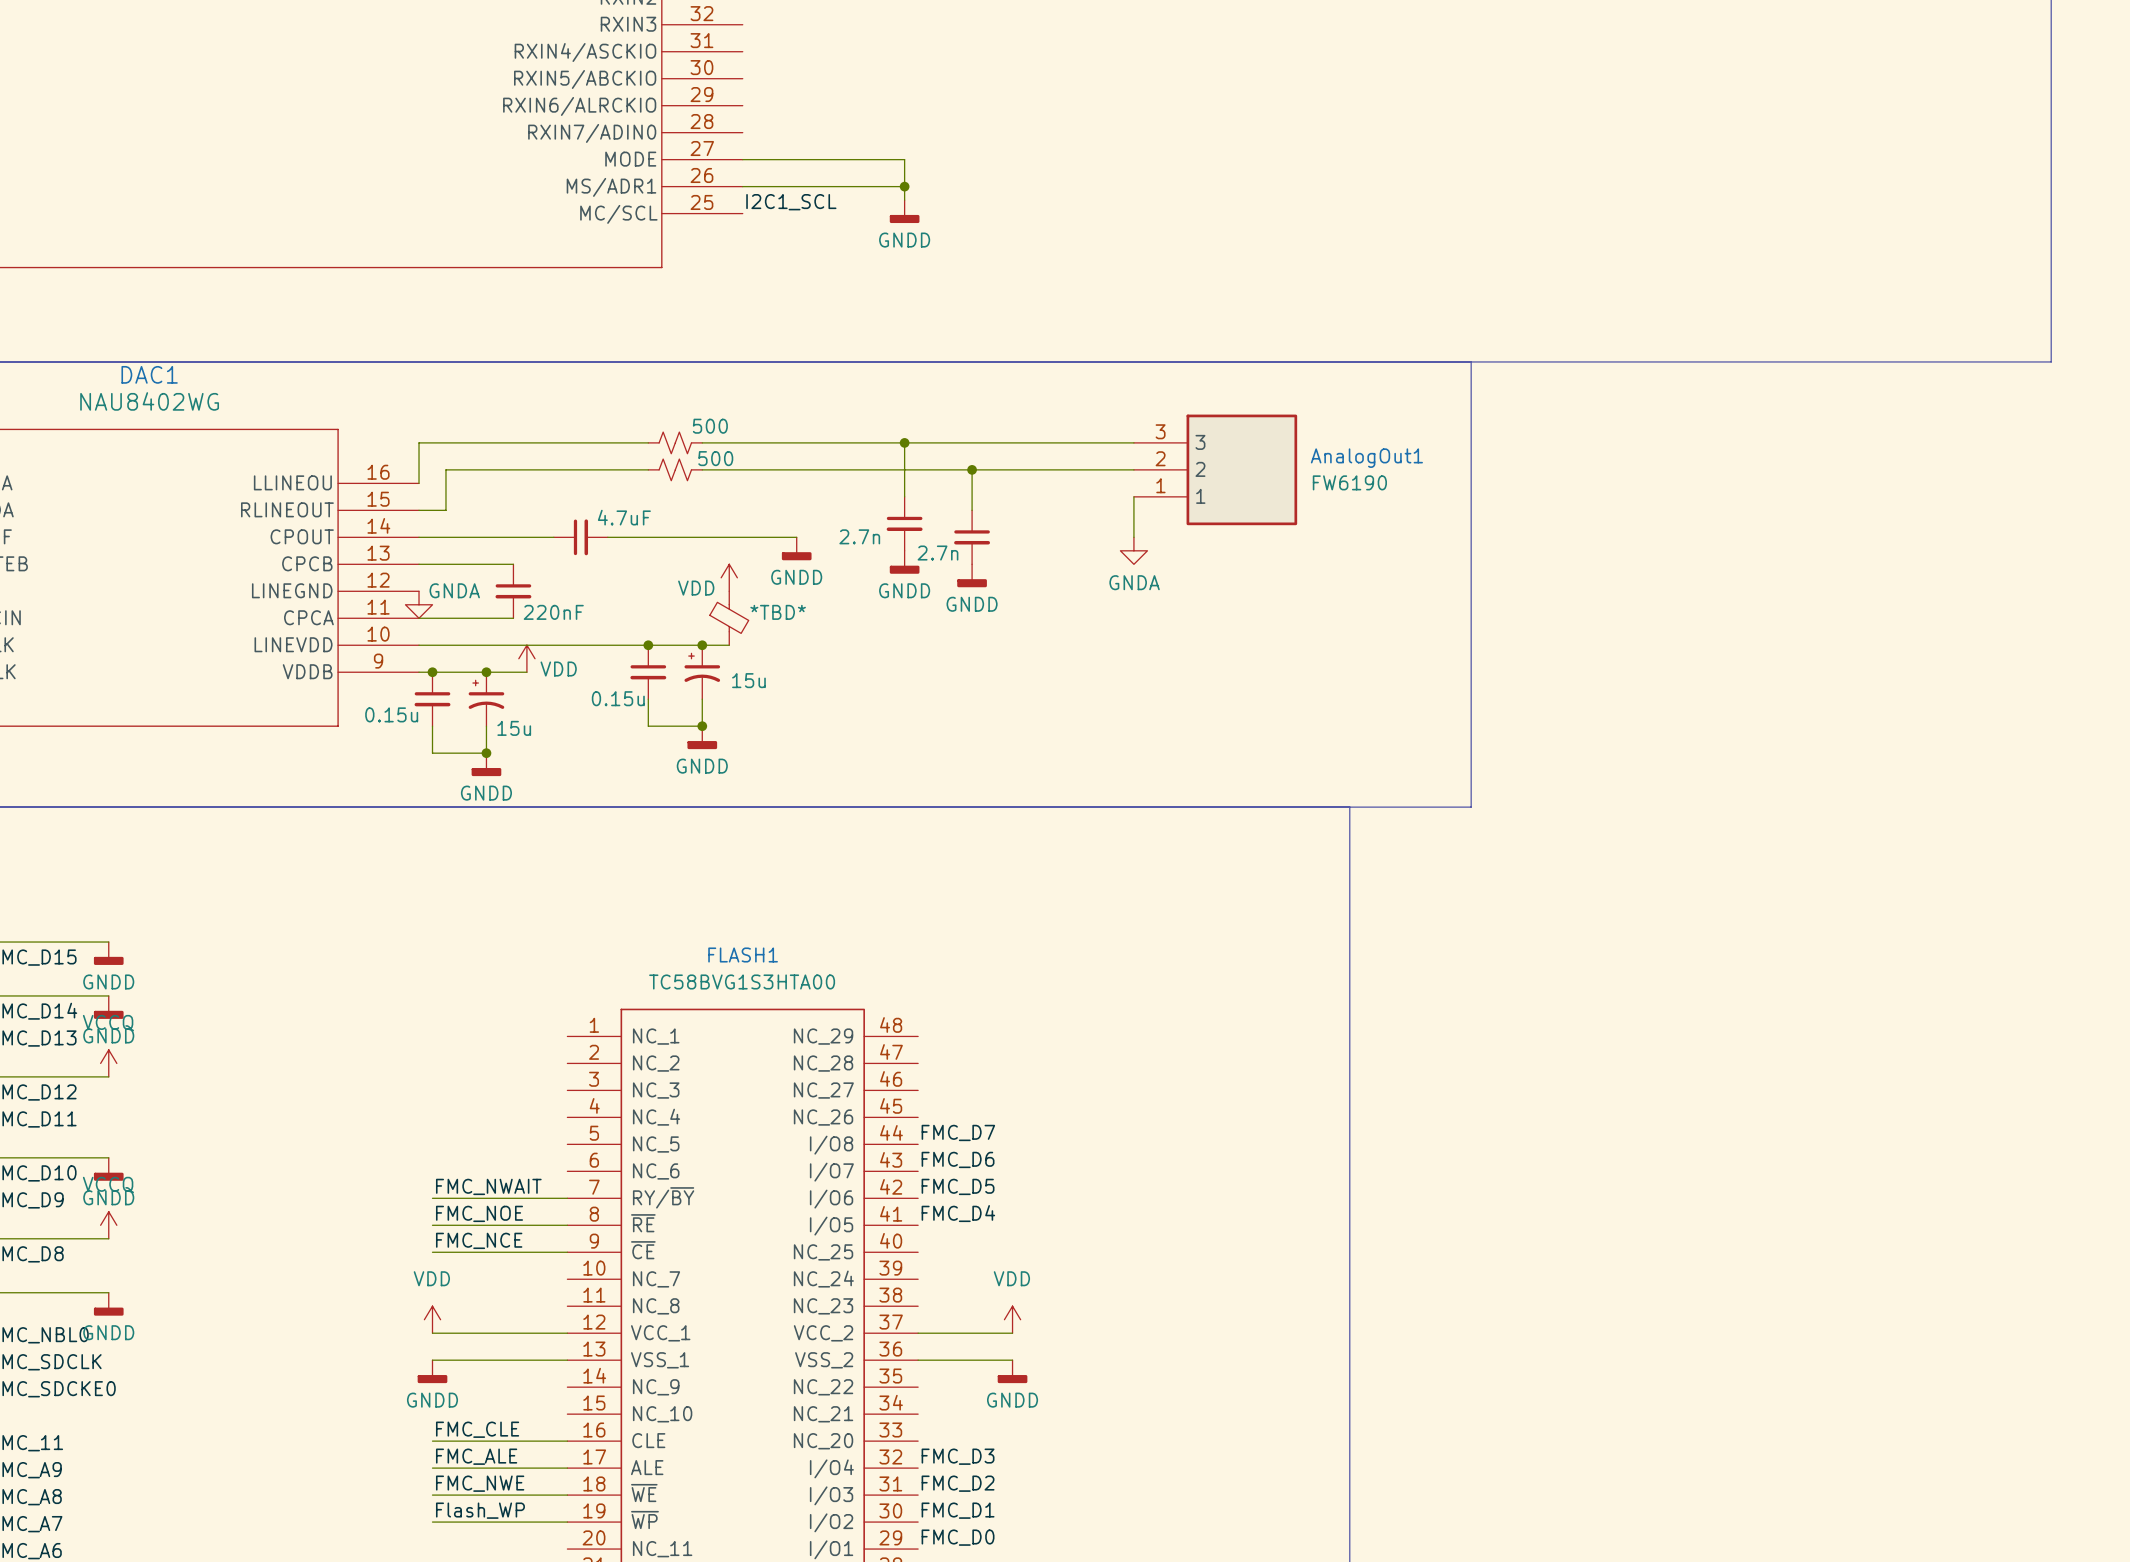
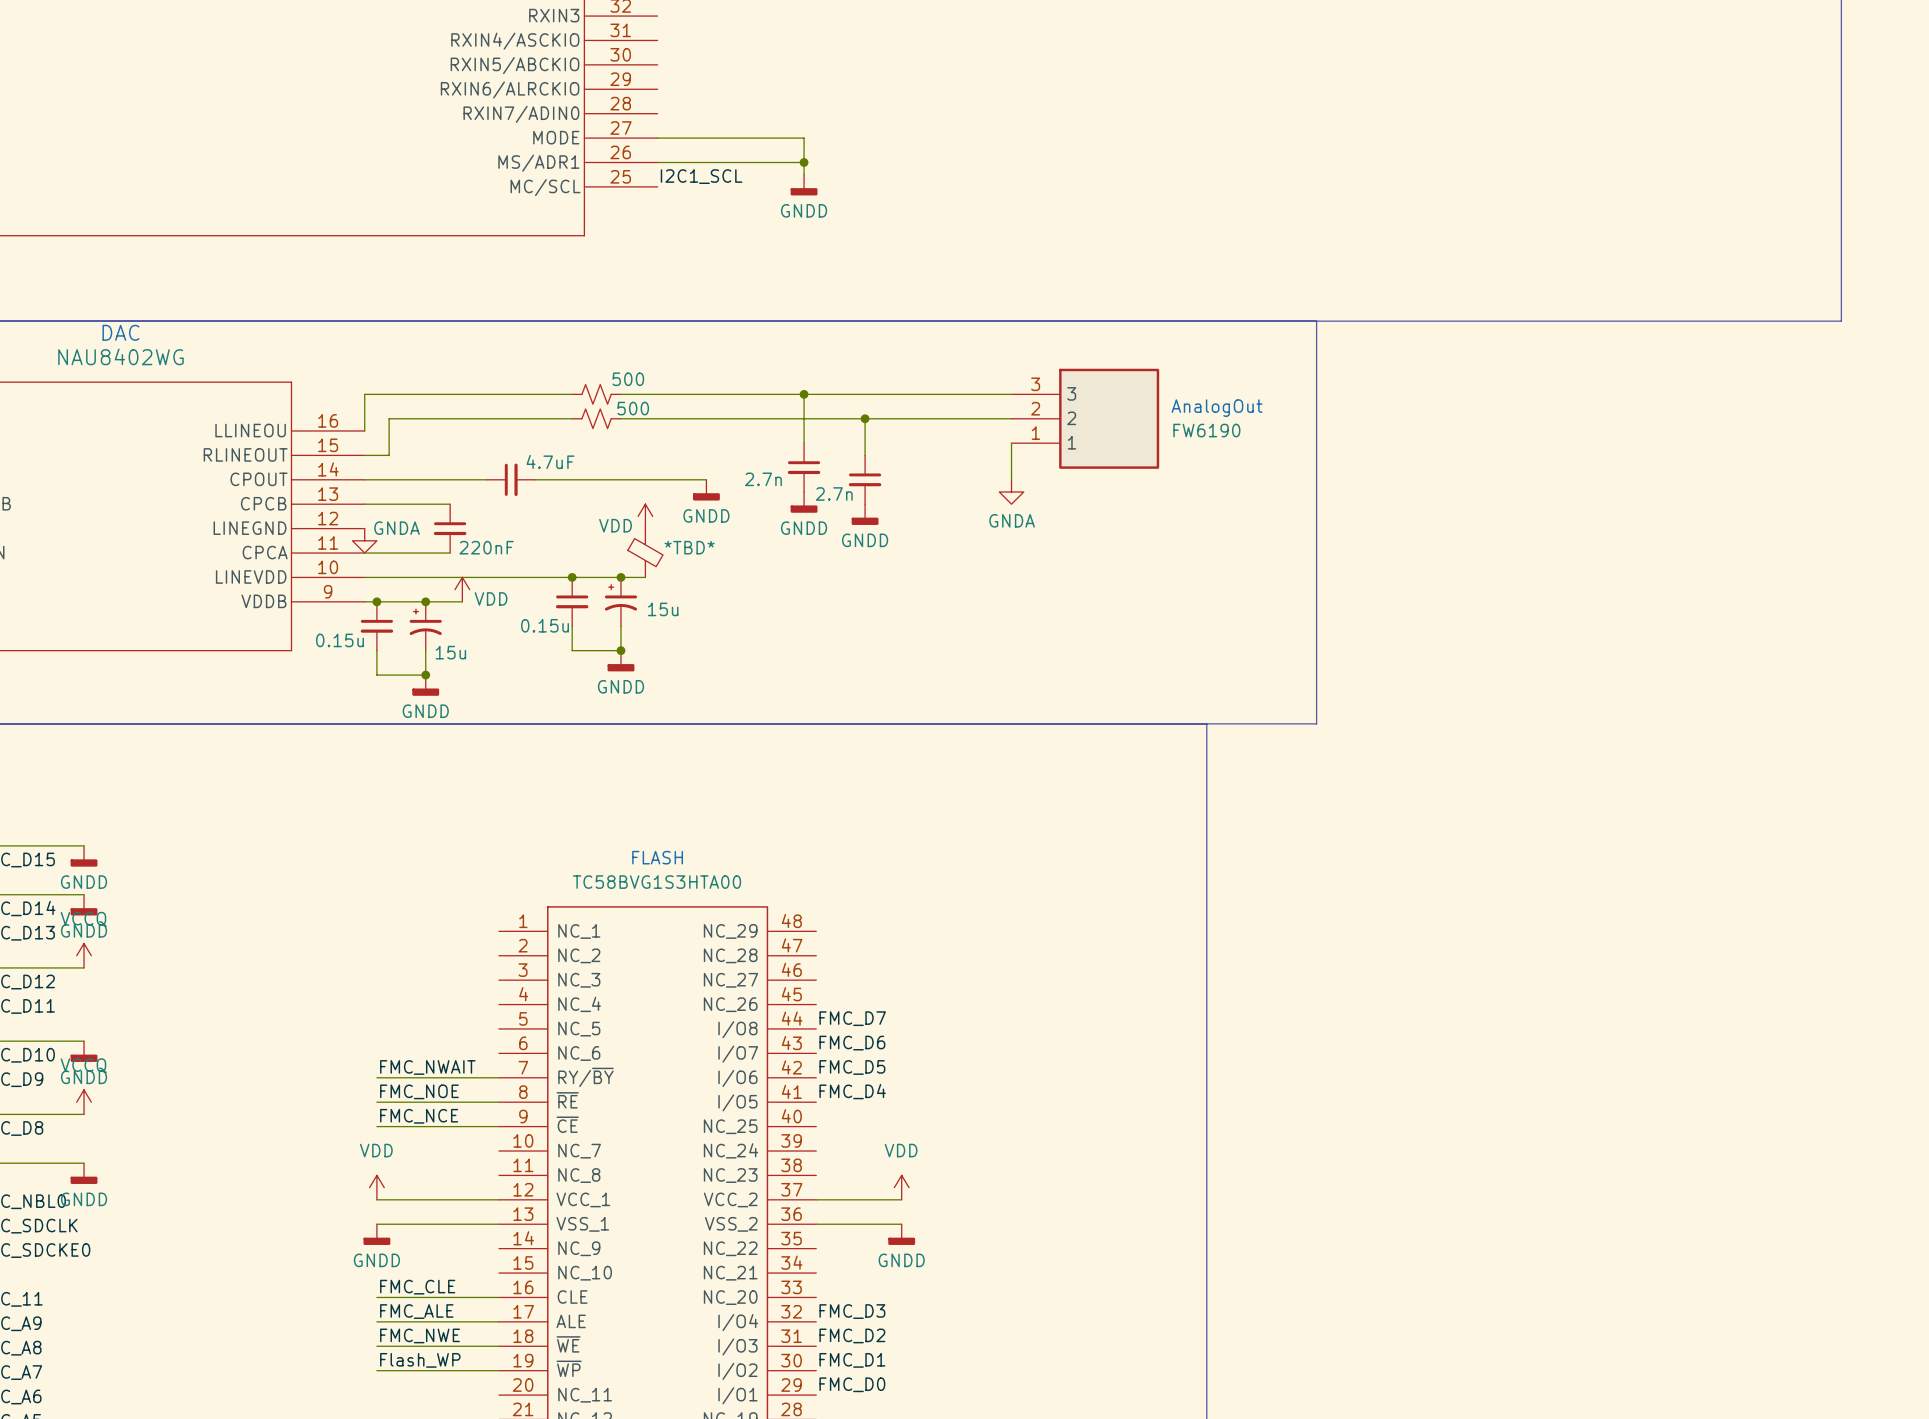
DAC1 name: DAC1 (149, 374) -> DAC (120, 332)
AnalogOut1 name: AnalogOut1 (1366, 458) -> AnalogOut (1217, 408)
FLASH1 name: FLASH1 (743, 955) -> FLASH (657, 857)

